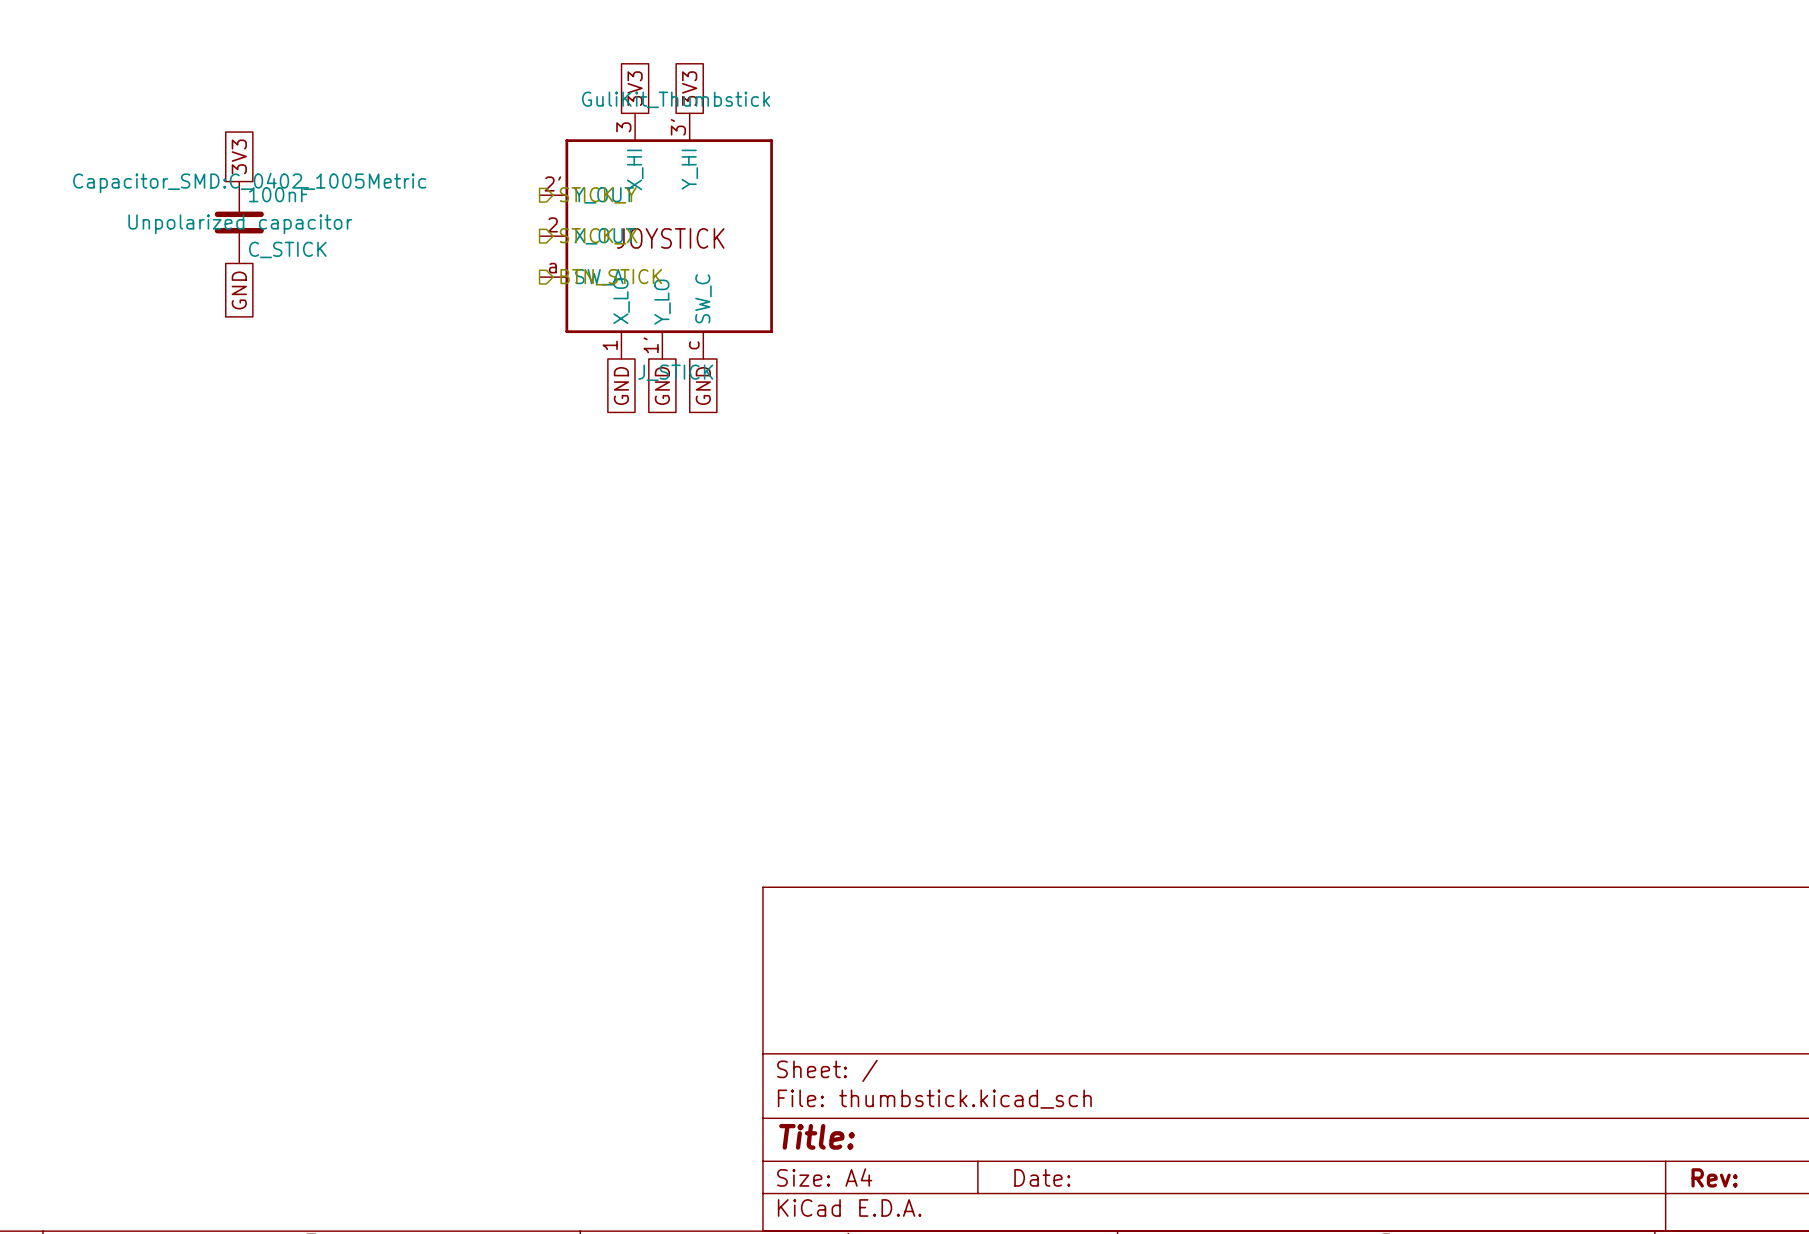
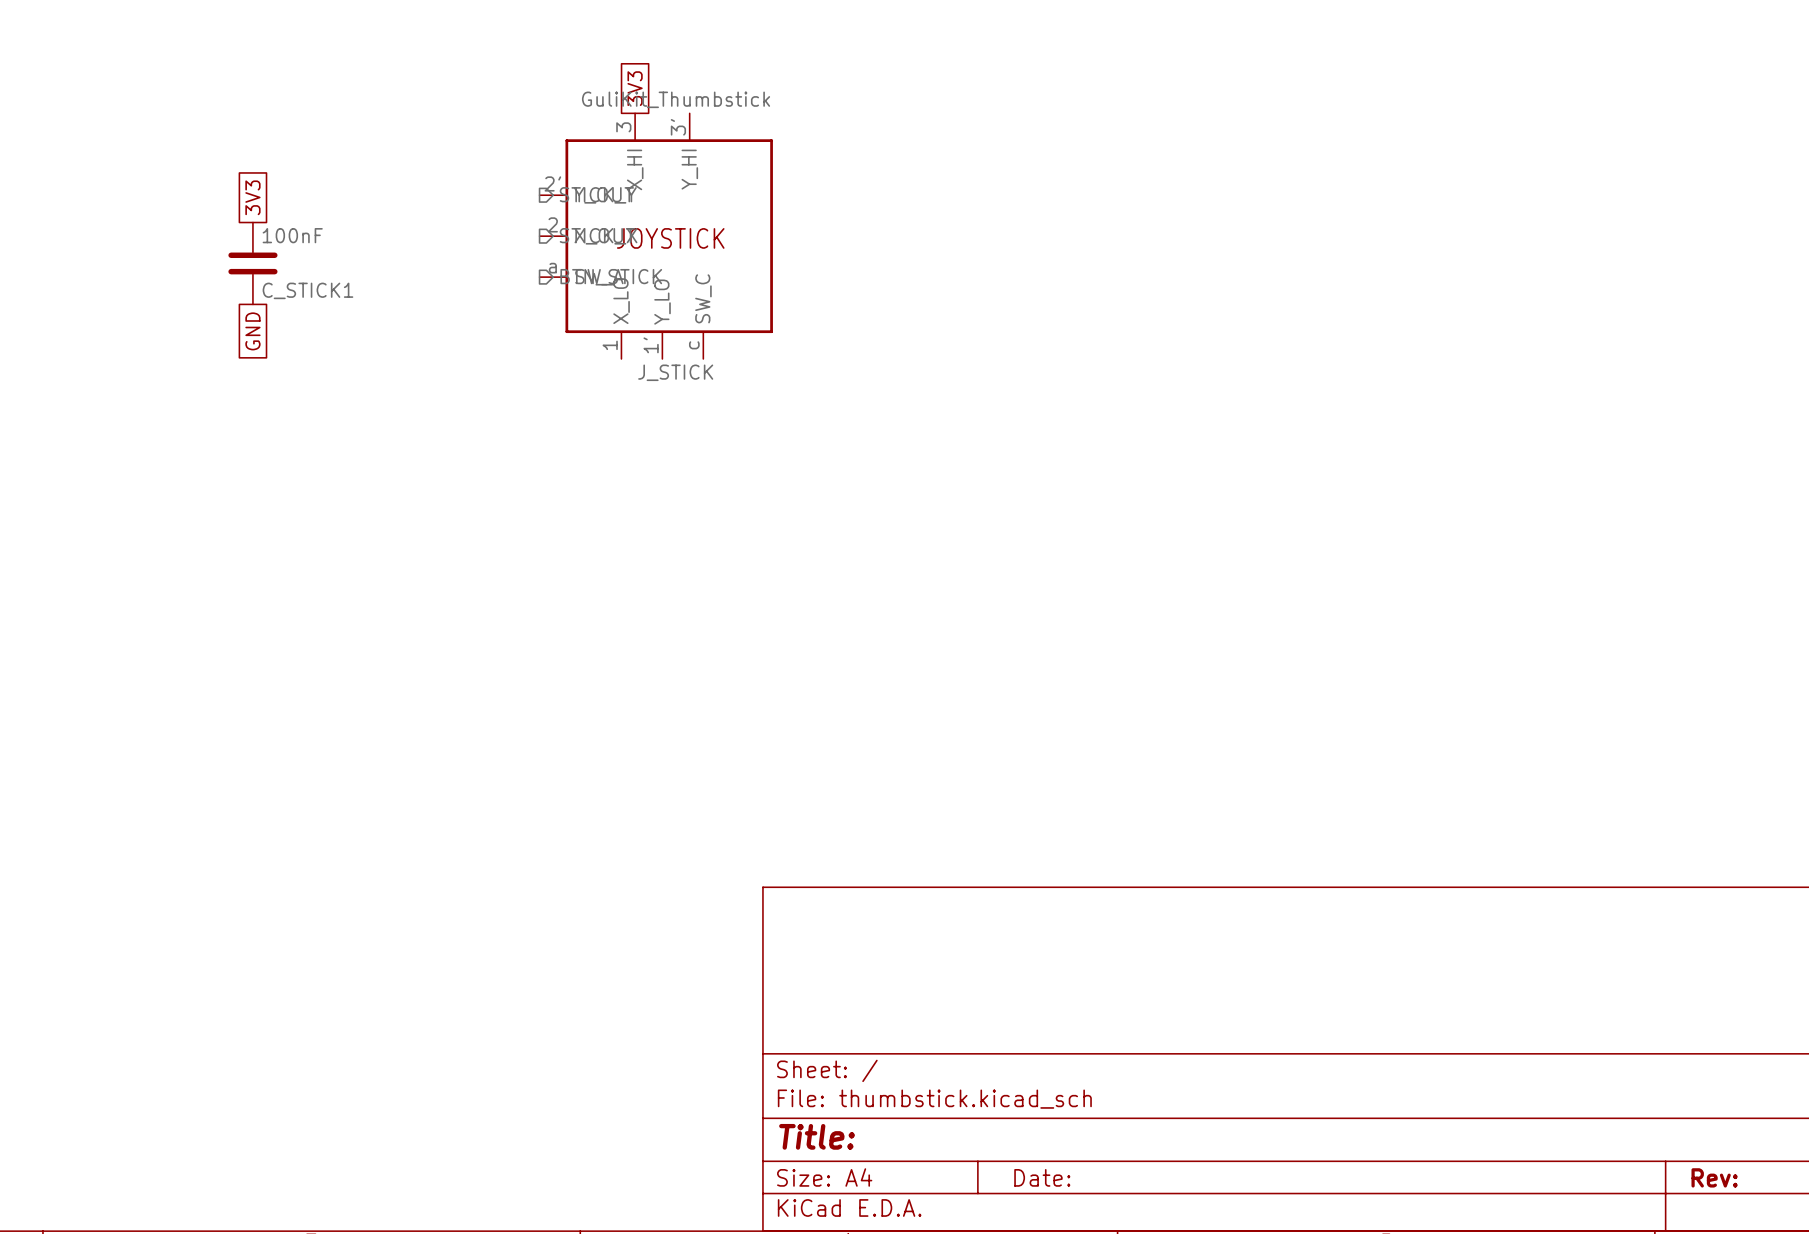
global label: 3V3 (689, 88) -> none
global label position: 3V3 (239, 156) -> 3V3 (252, 197)
C_STICK: 100nF (239, 222) -> none
C_STICK1: none -> 100nF (252, 263)
global label position: GND (239, 290) -> GND (252, 331)
global label: GND (621, 385) -> none
global label: GND (662, 385) -> none
global label: GND (703, 385) -> none

